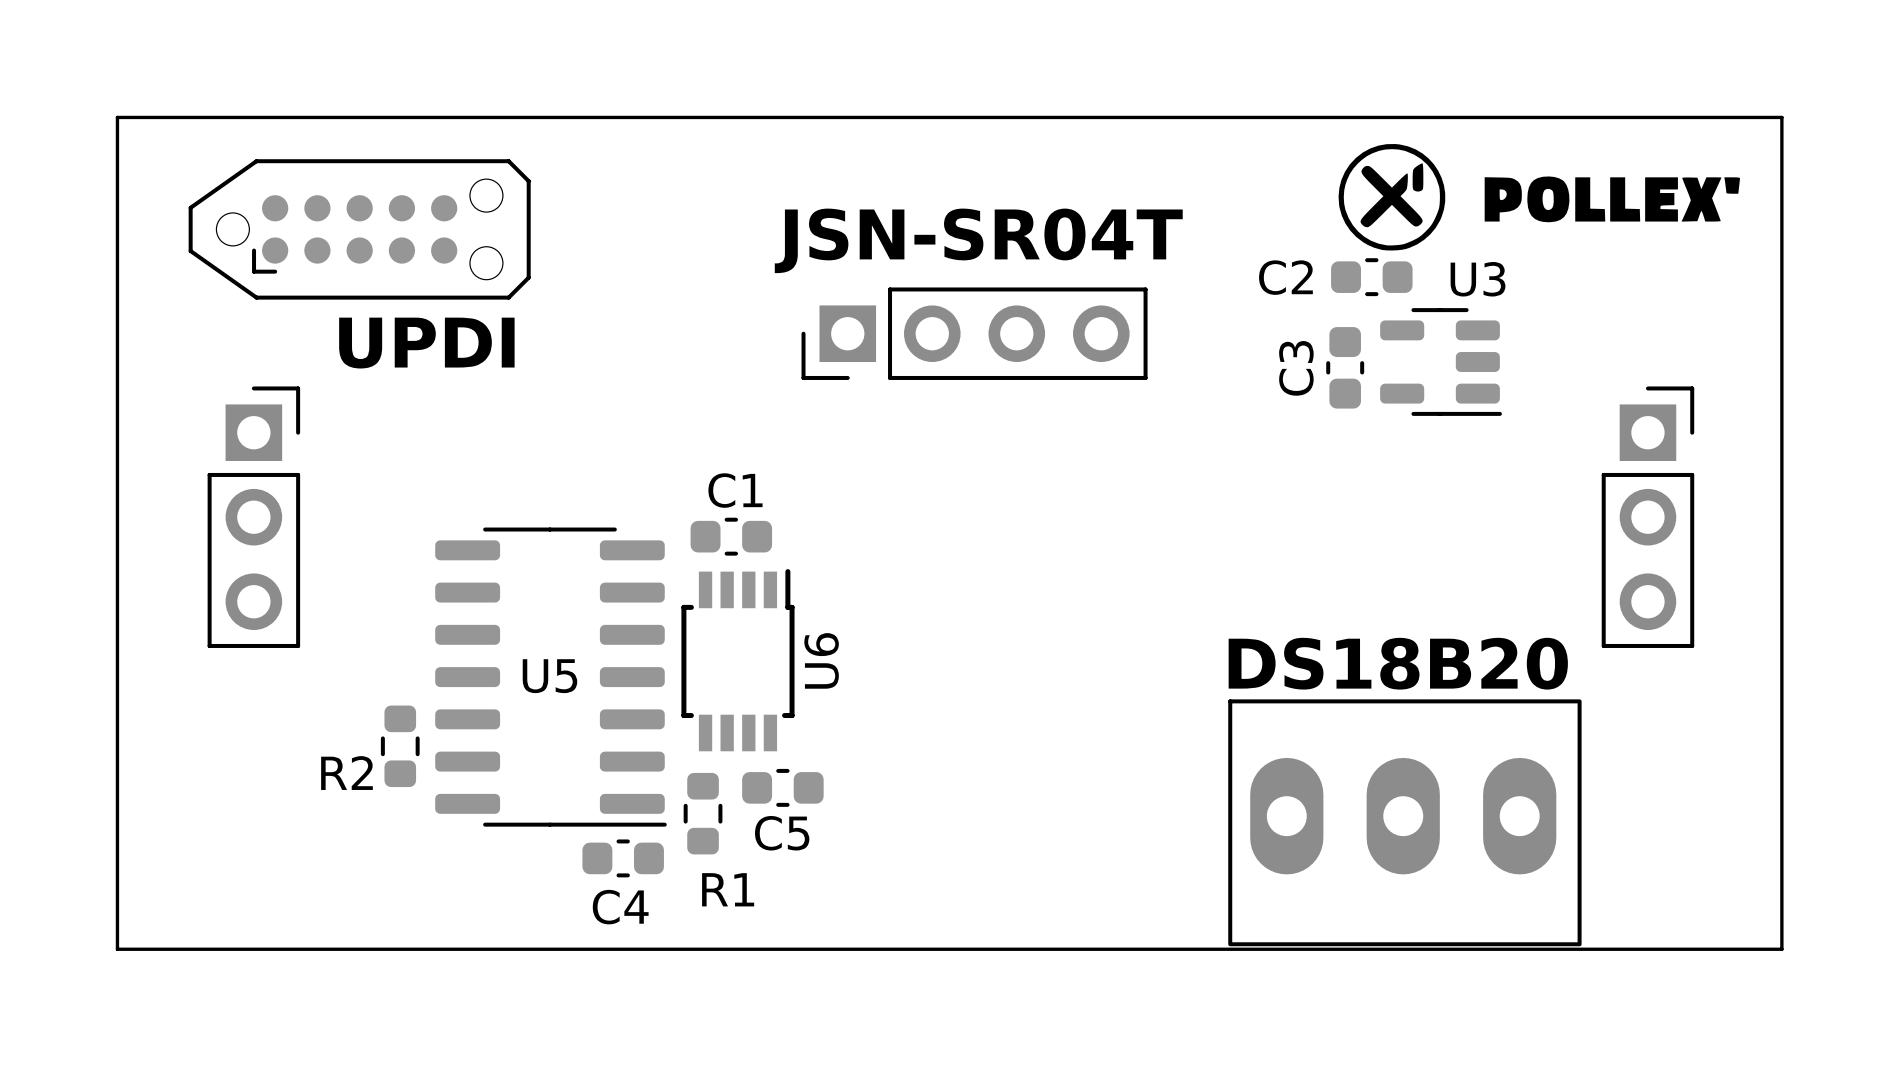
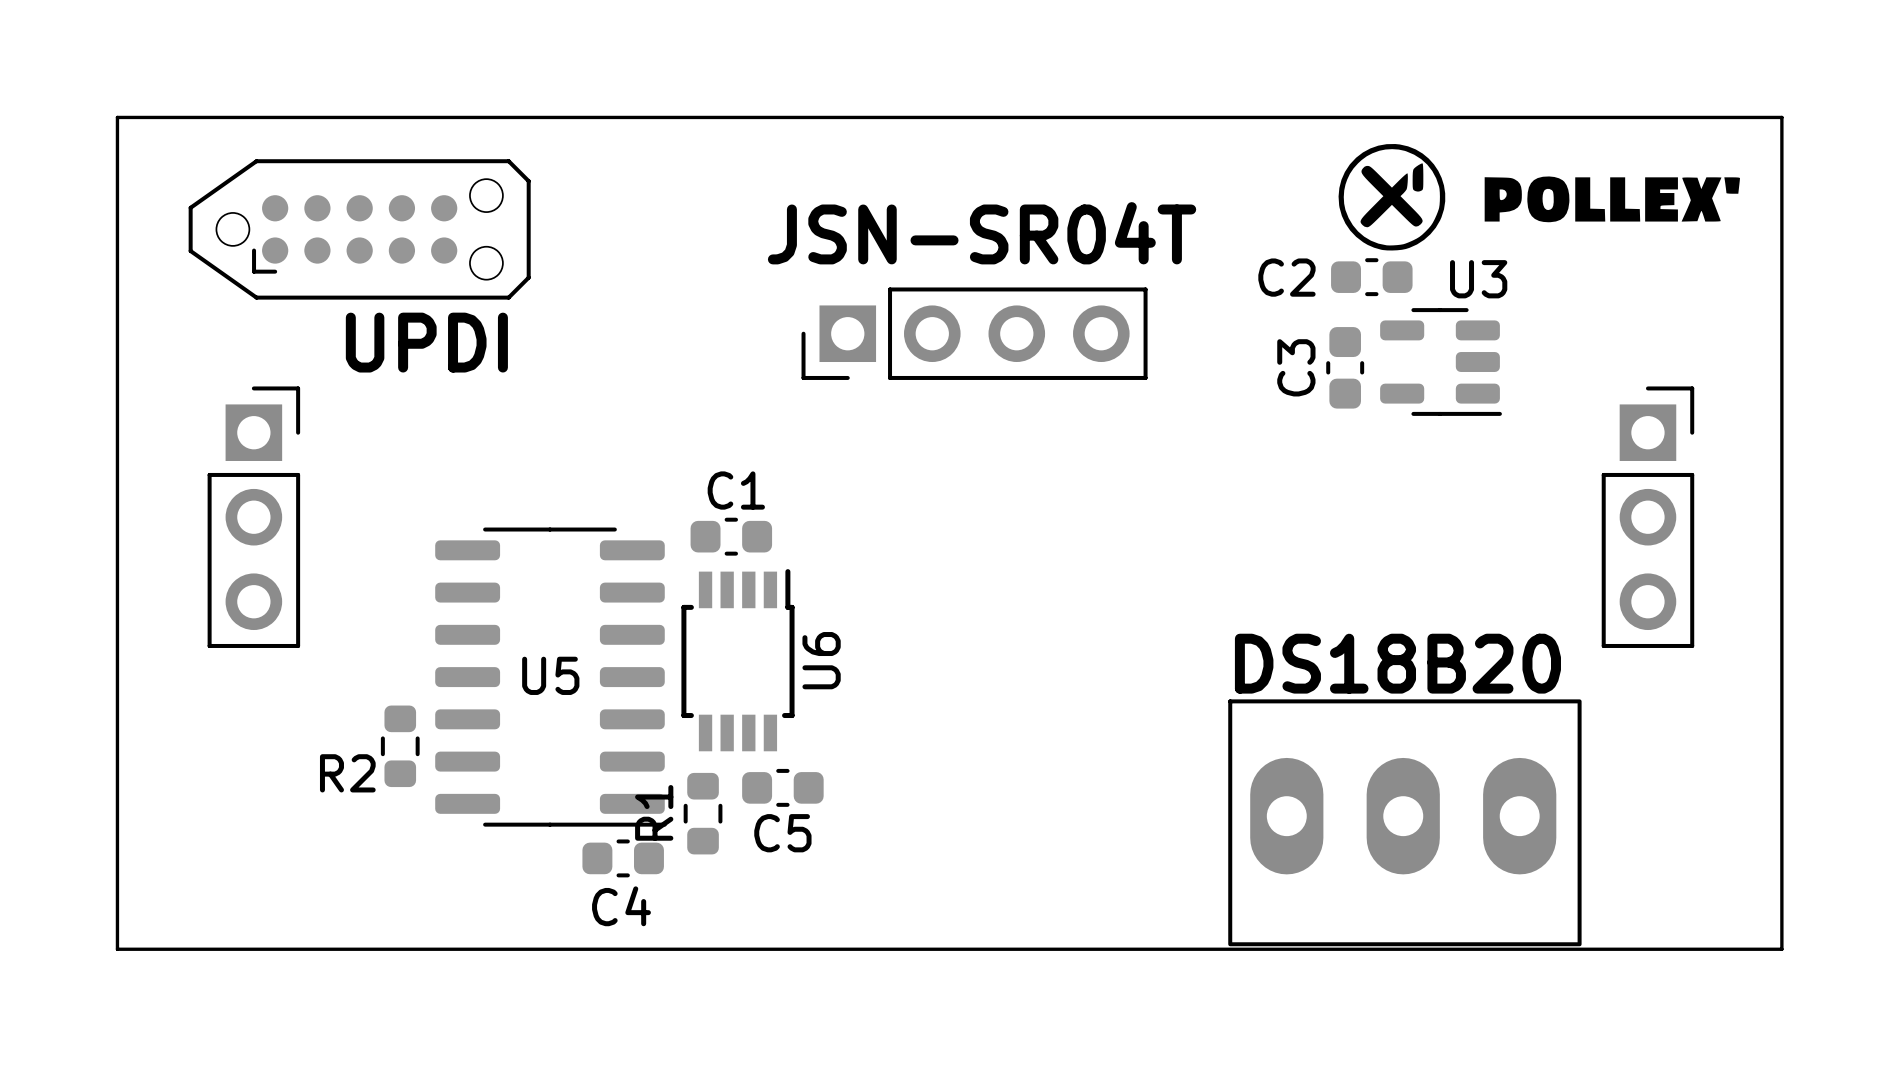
R1 name rotation: 0° (728, 889) -> 90° counterclockwise (654, 812)
R1 name position: R1 (728, 889) -> R1 (654, 812)

